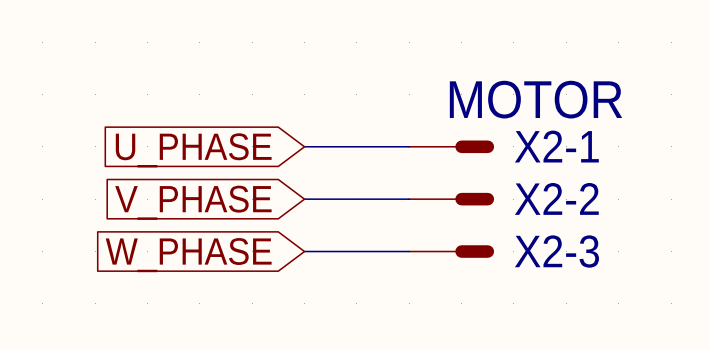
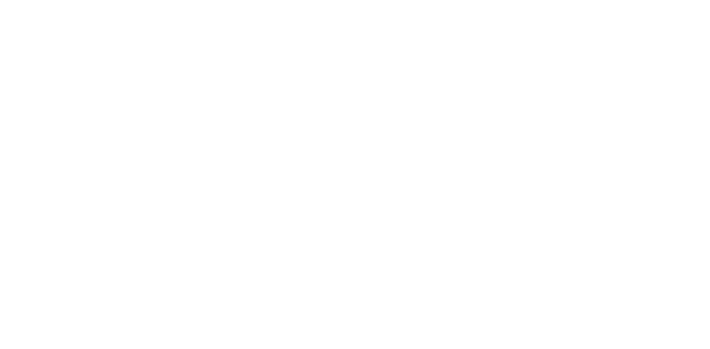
wire: (304, 146) (409, 146) -> none
X2-1: MOTOR (451, 146) -> none
global label: U_PHASE (193, 150) -> none
wire: (304, 199) (409, 199) -> none
X2-2: (451, 199) -> none
global label: V_PHASE (193, 202) -> none
wire: (304, 251) (409, 251) -> none
X2-3: (451, 251) -> none
global label: W_PHASE (188, 255) -> none

